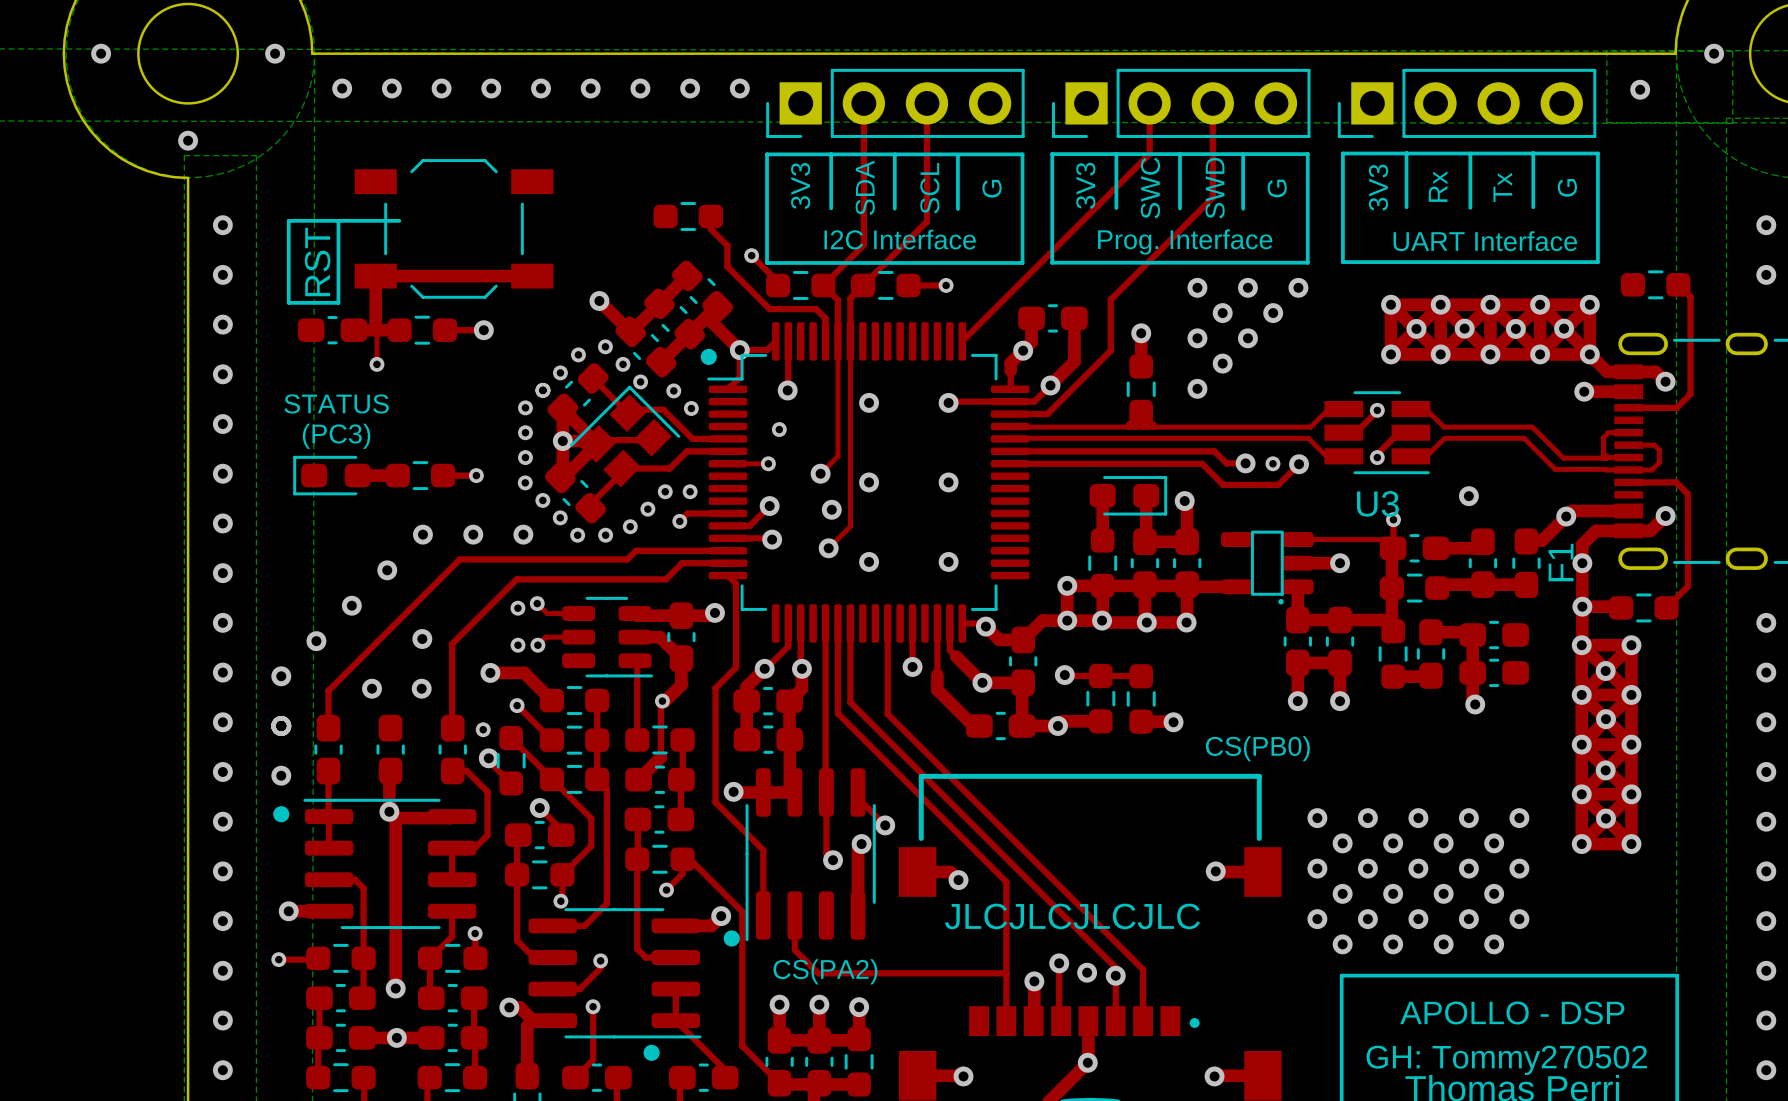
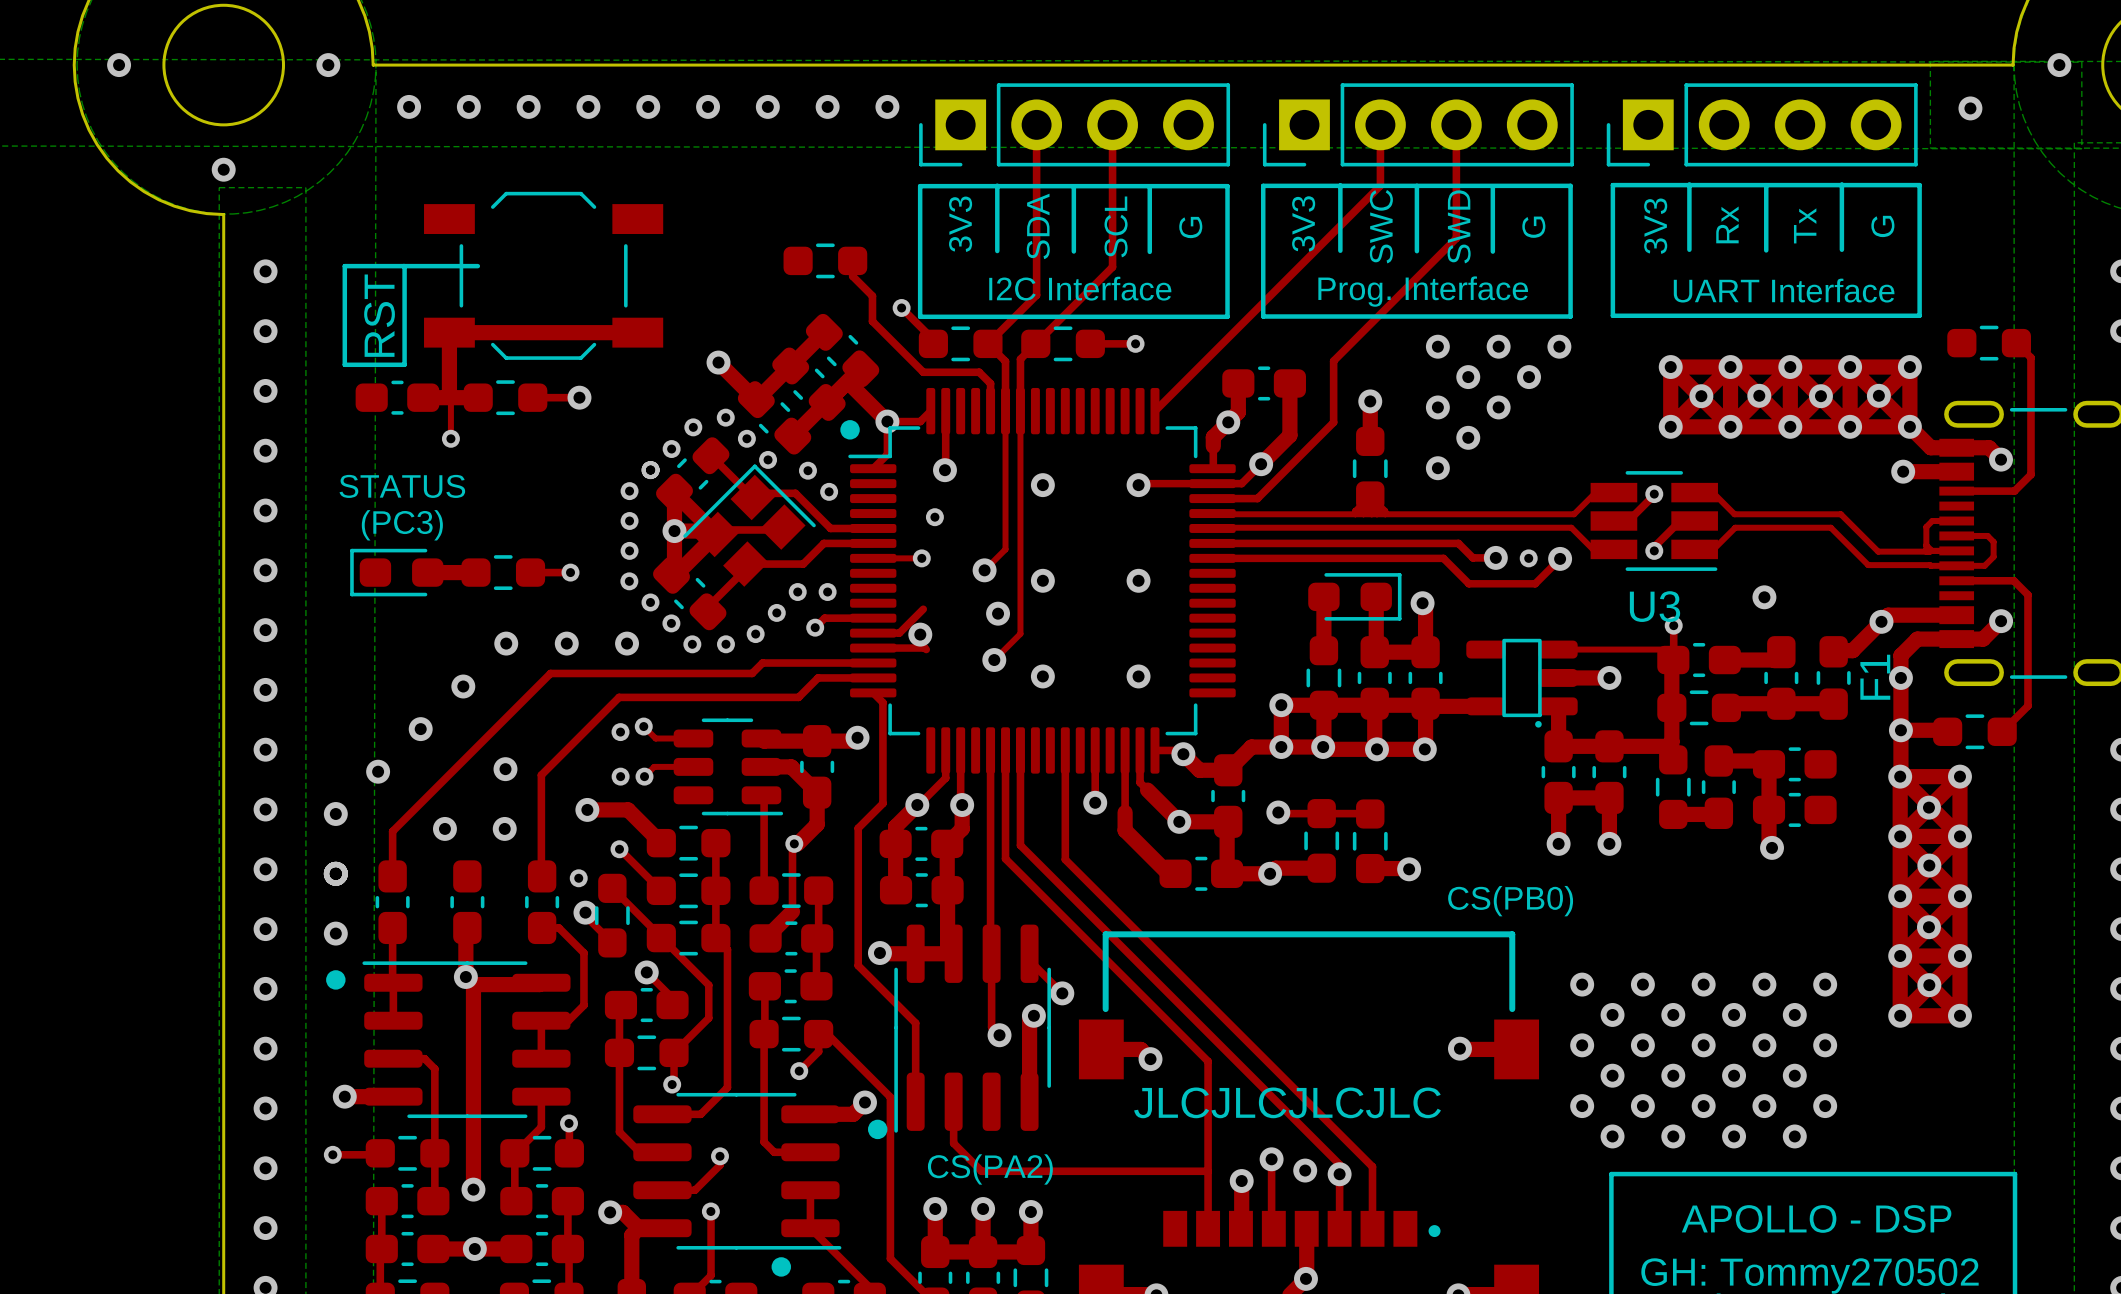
via: (769, 506) -> none
via position: (772, 539) -> (920, 634)

